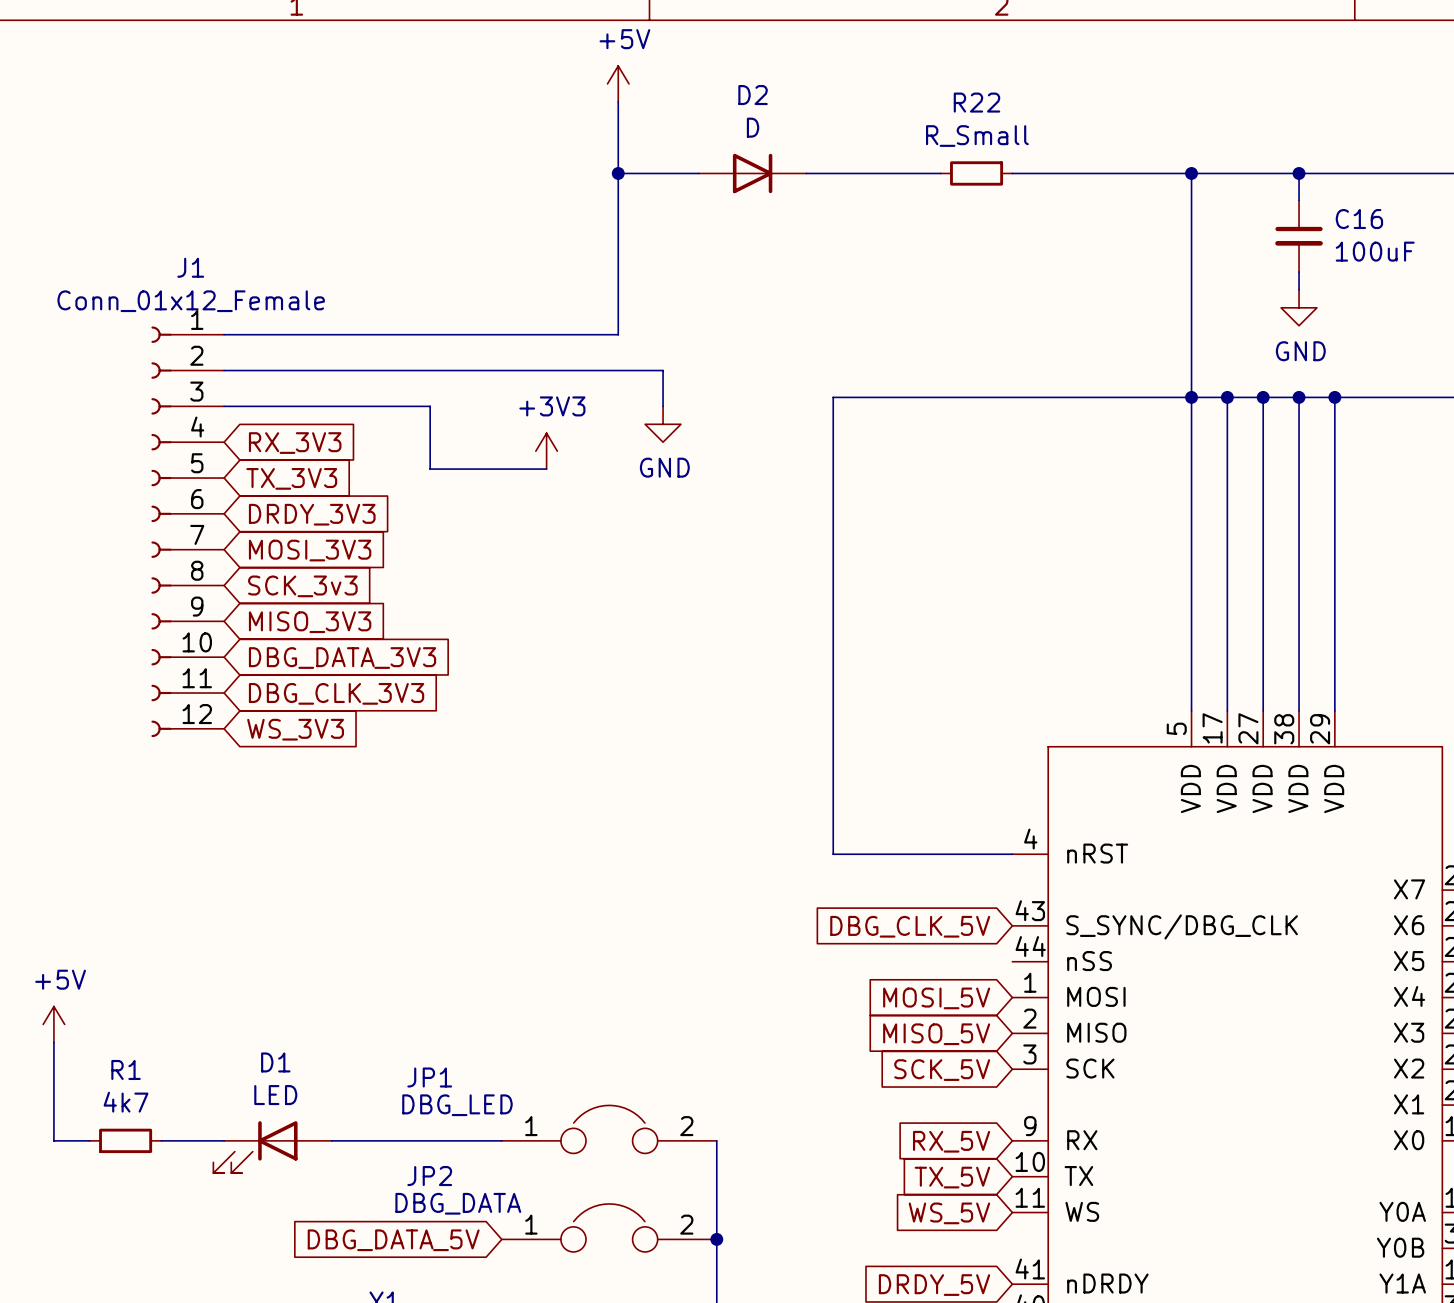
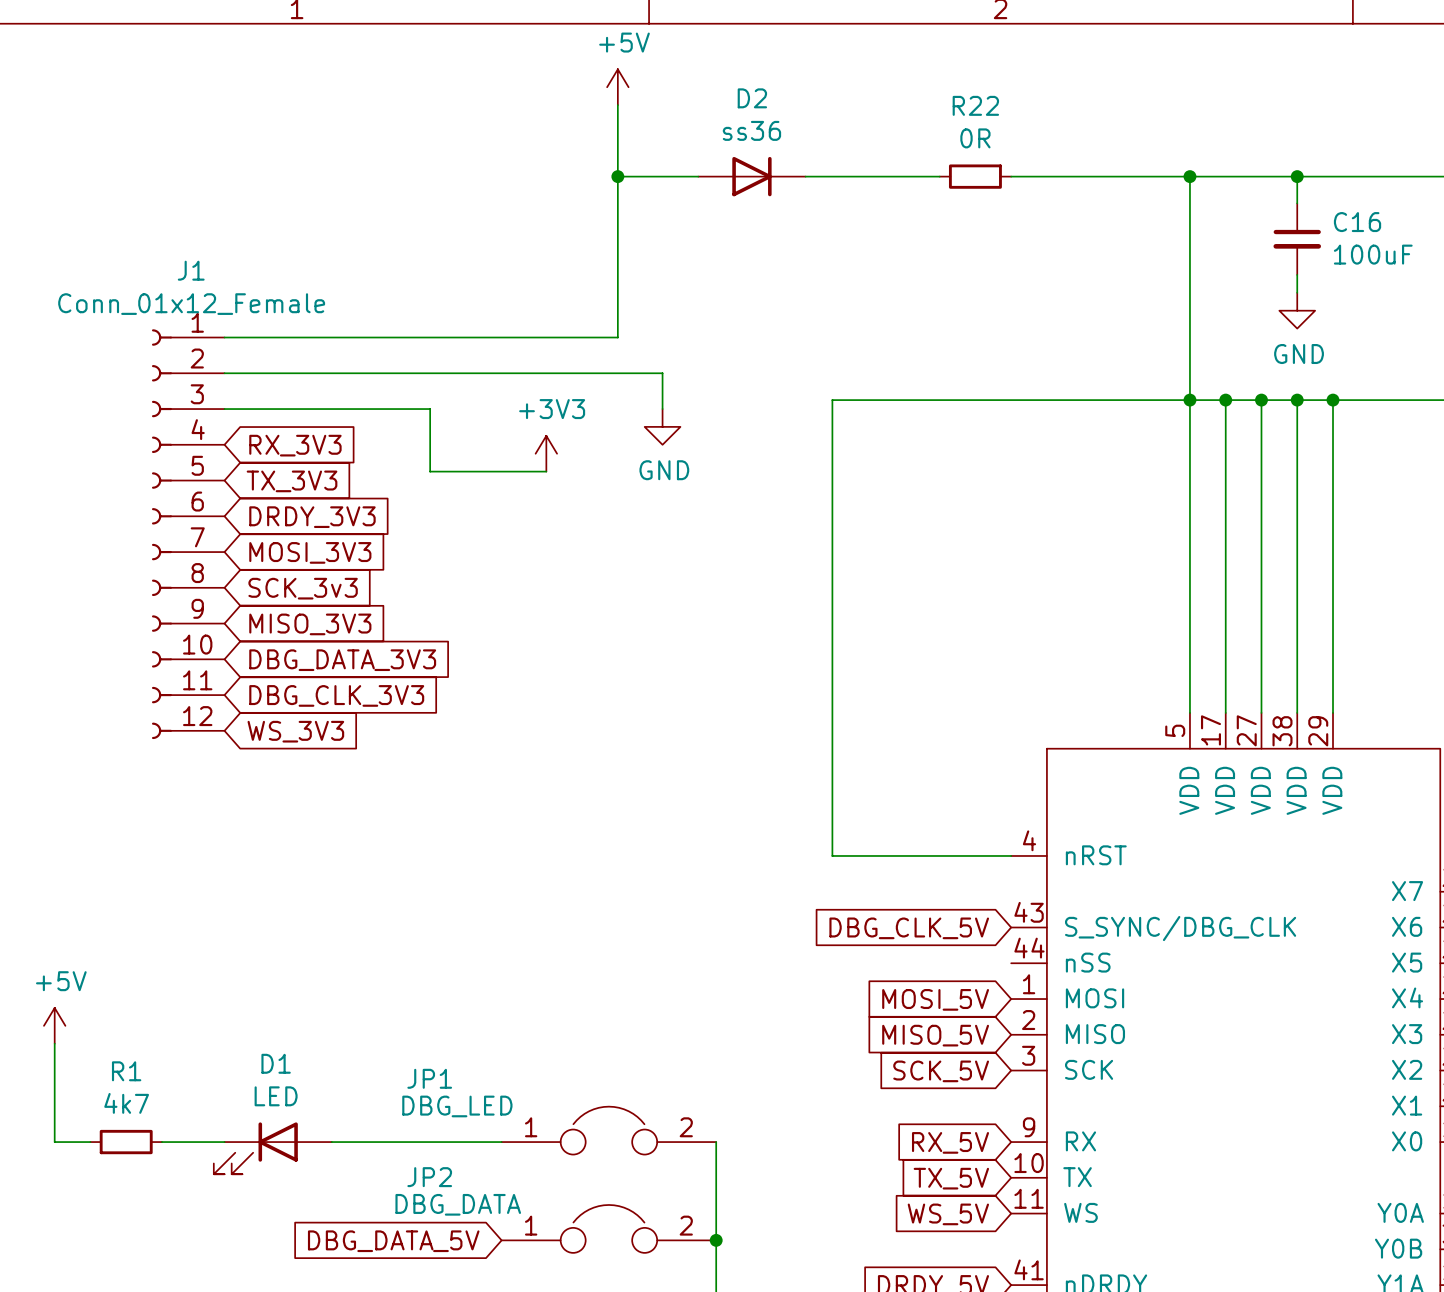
D2 value: D (753, 127) -> ss36 (751, 130)
R22 value: R_Small (977, 136) -> 0R (975, 138)

